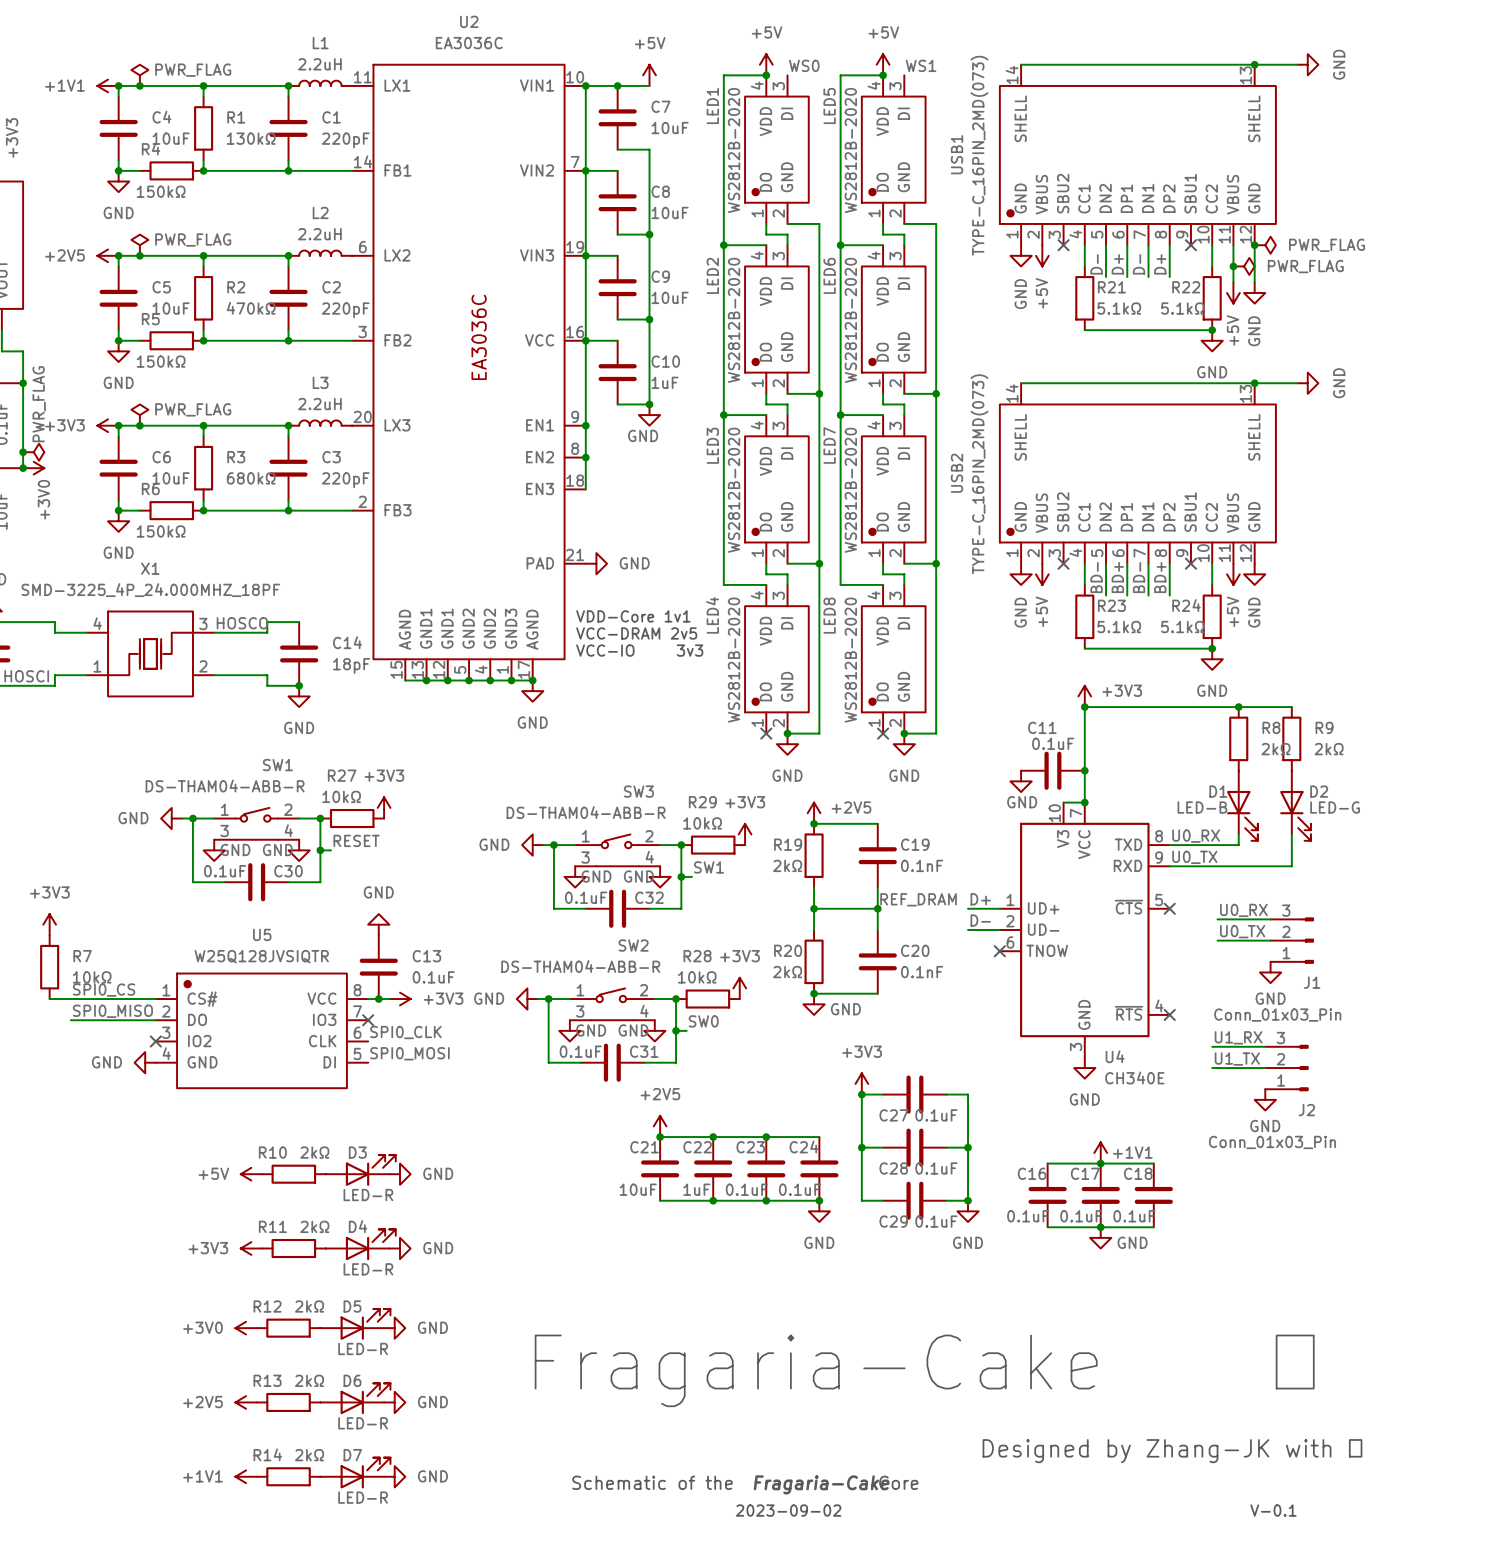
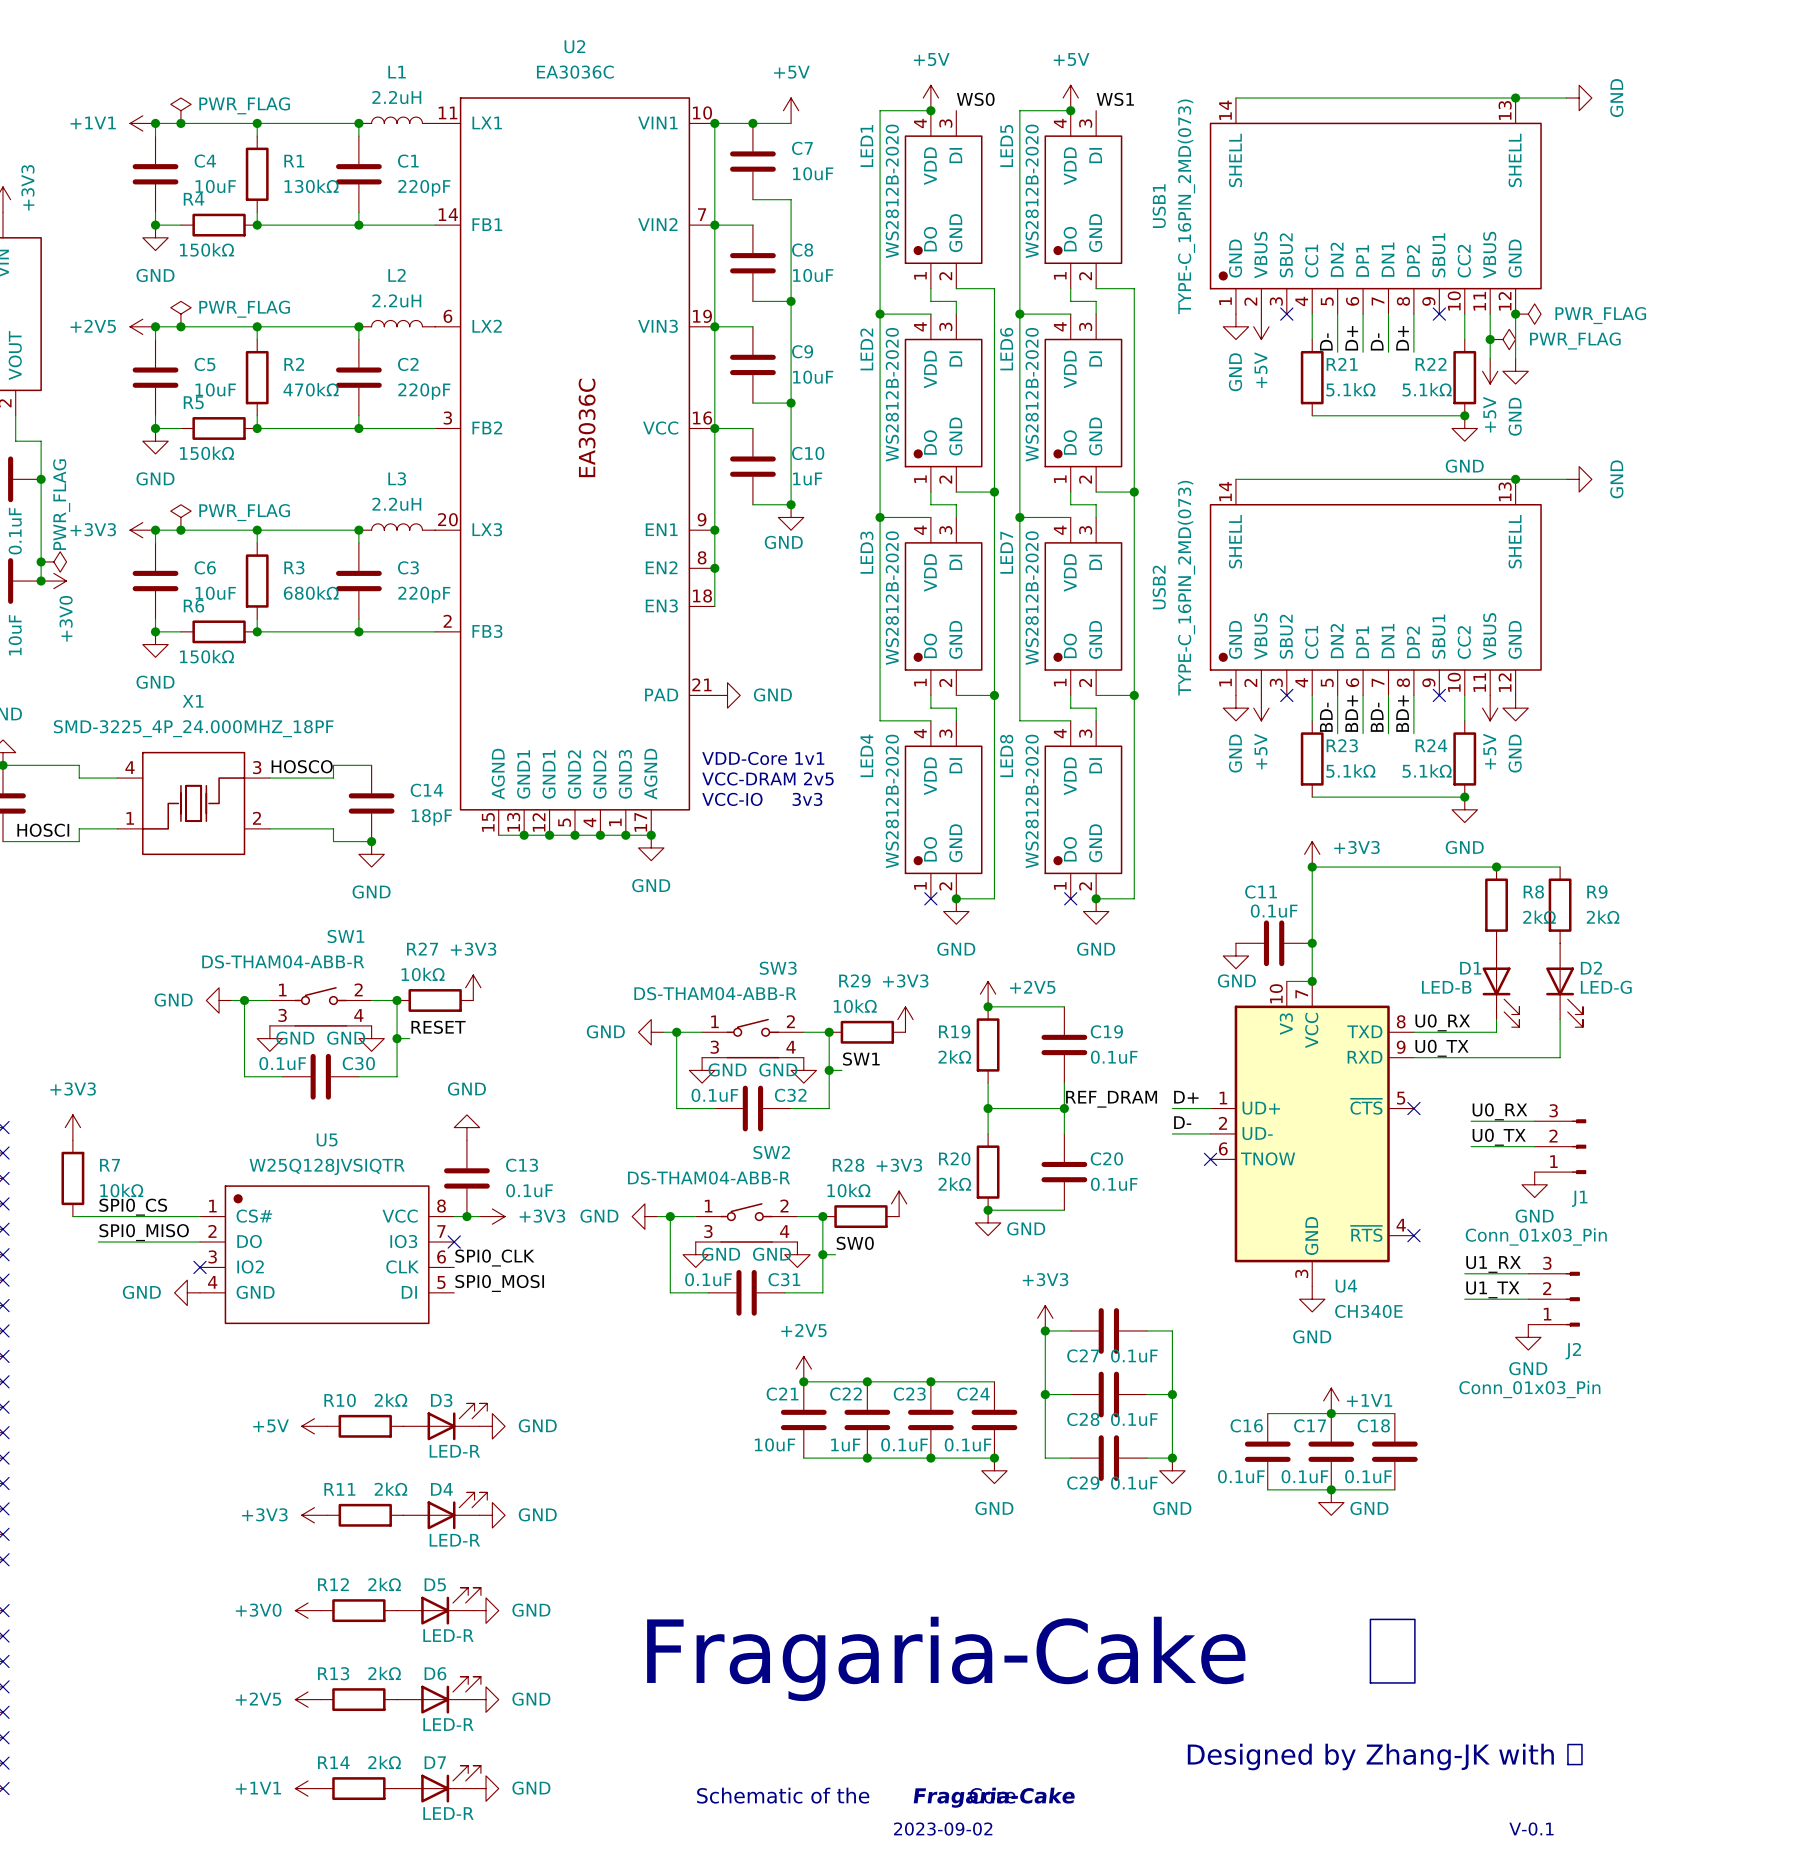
C19 value: 0.1nF (922, 865) -> 0.1uF (1114, 1057)
C20 value: 0.1nF (922, 972) -> 0.1uF (1114, 1184)

